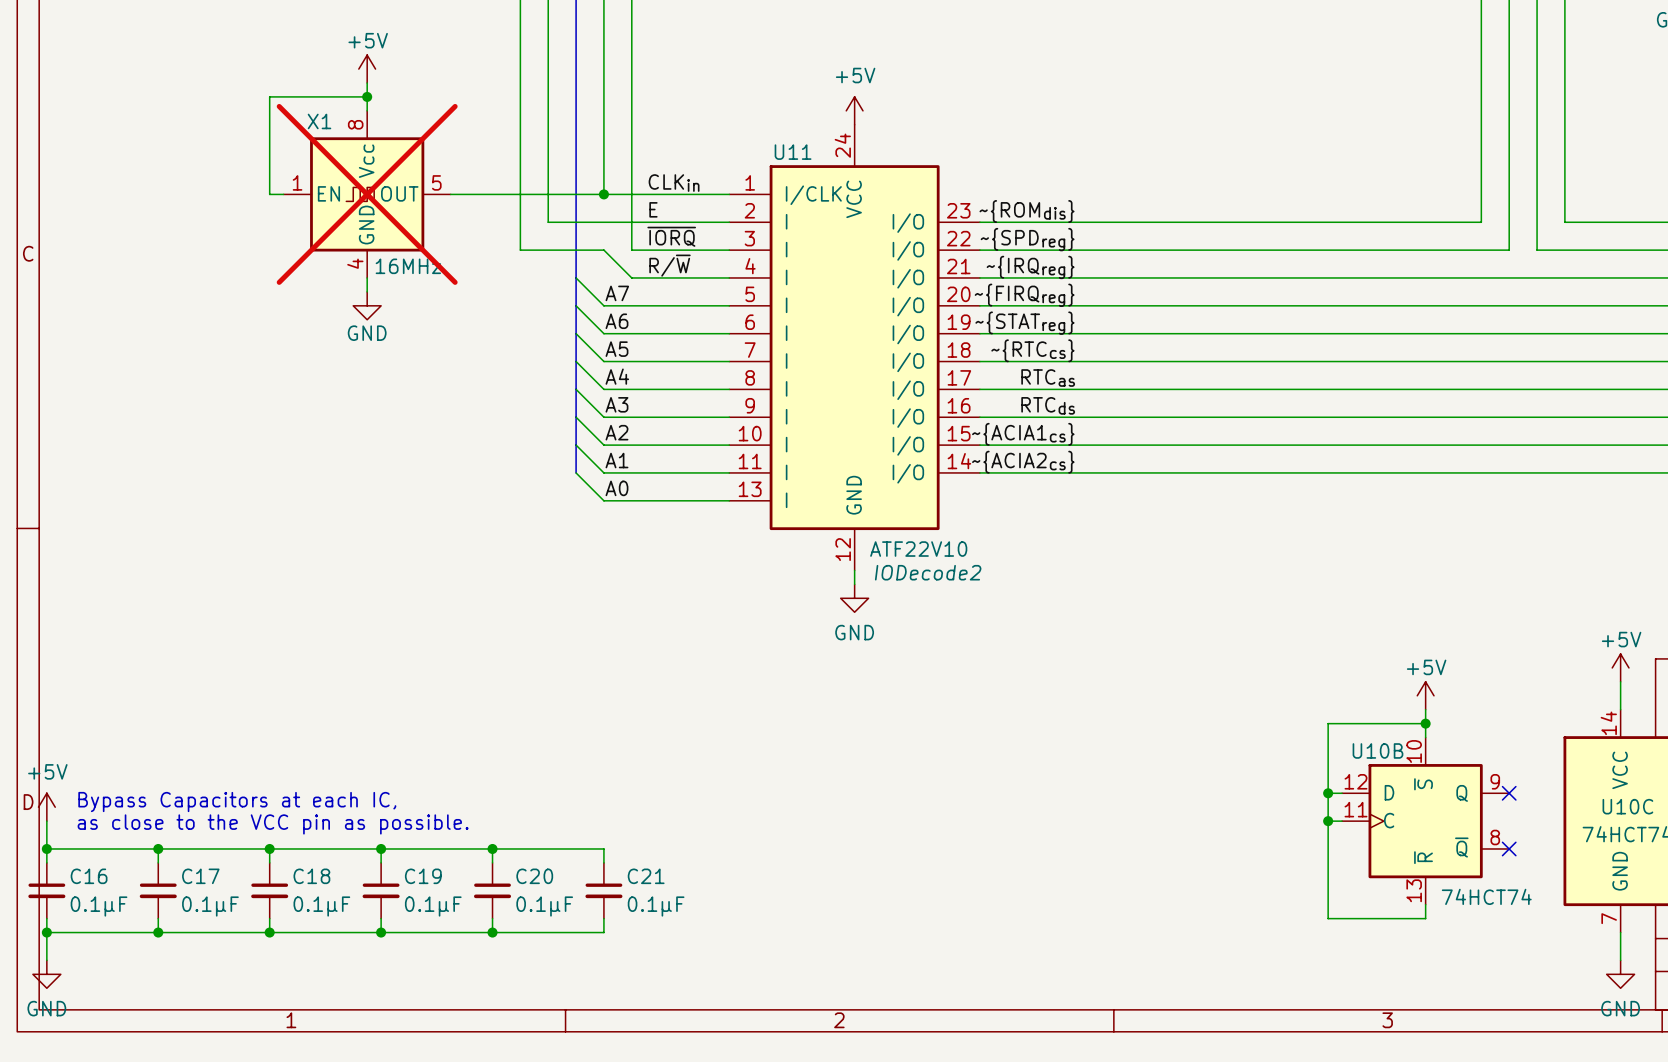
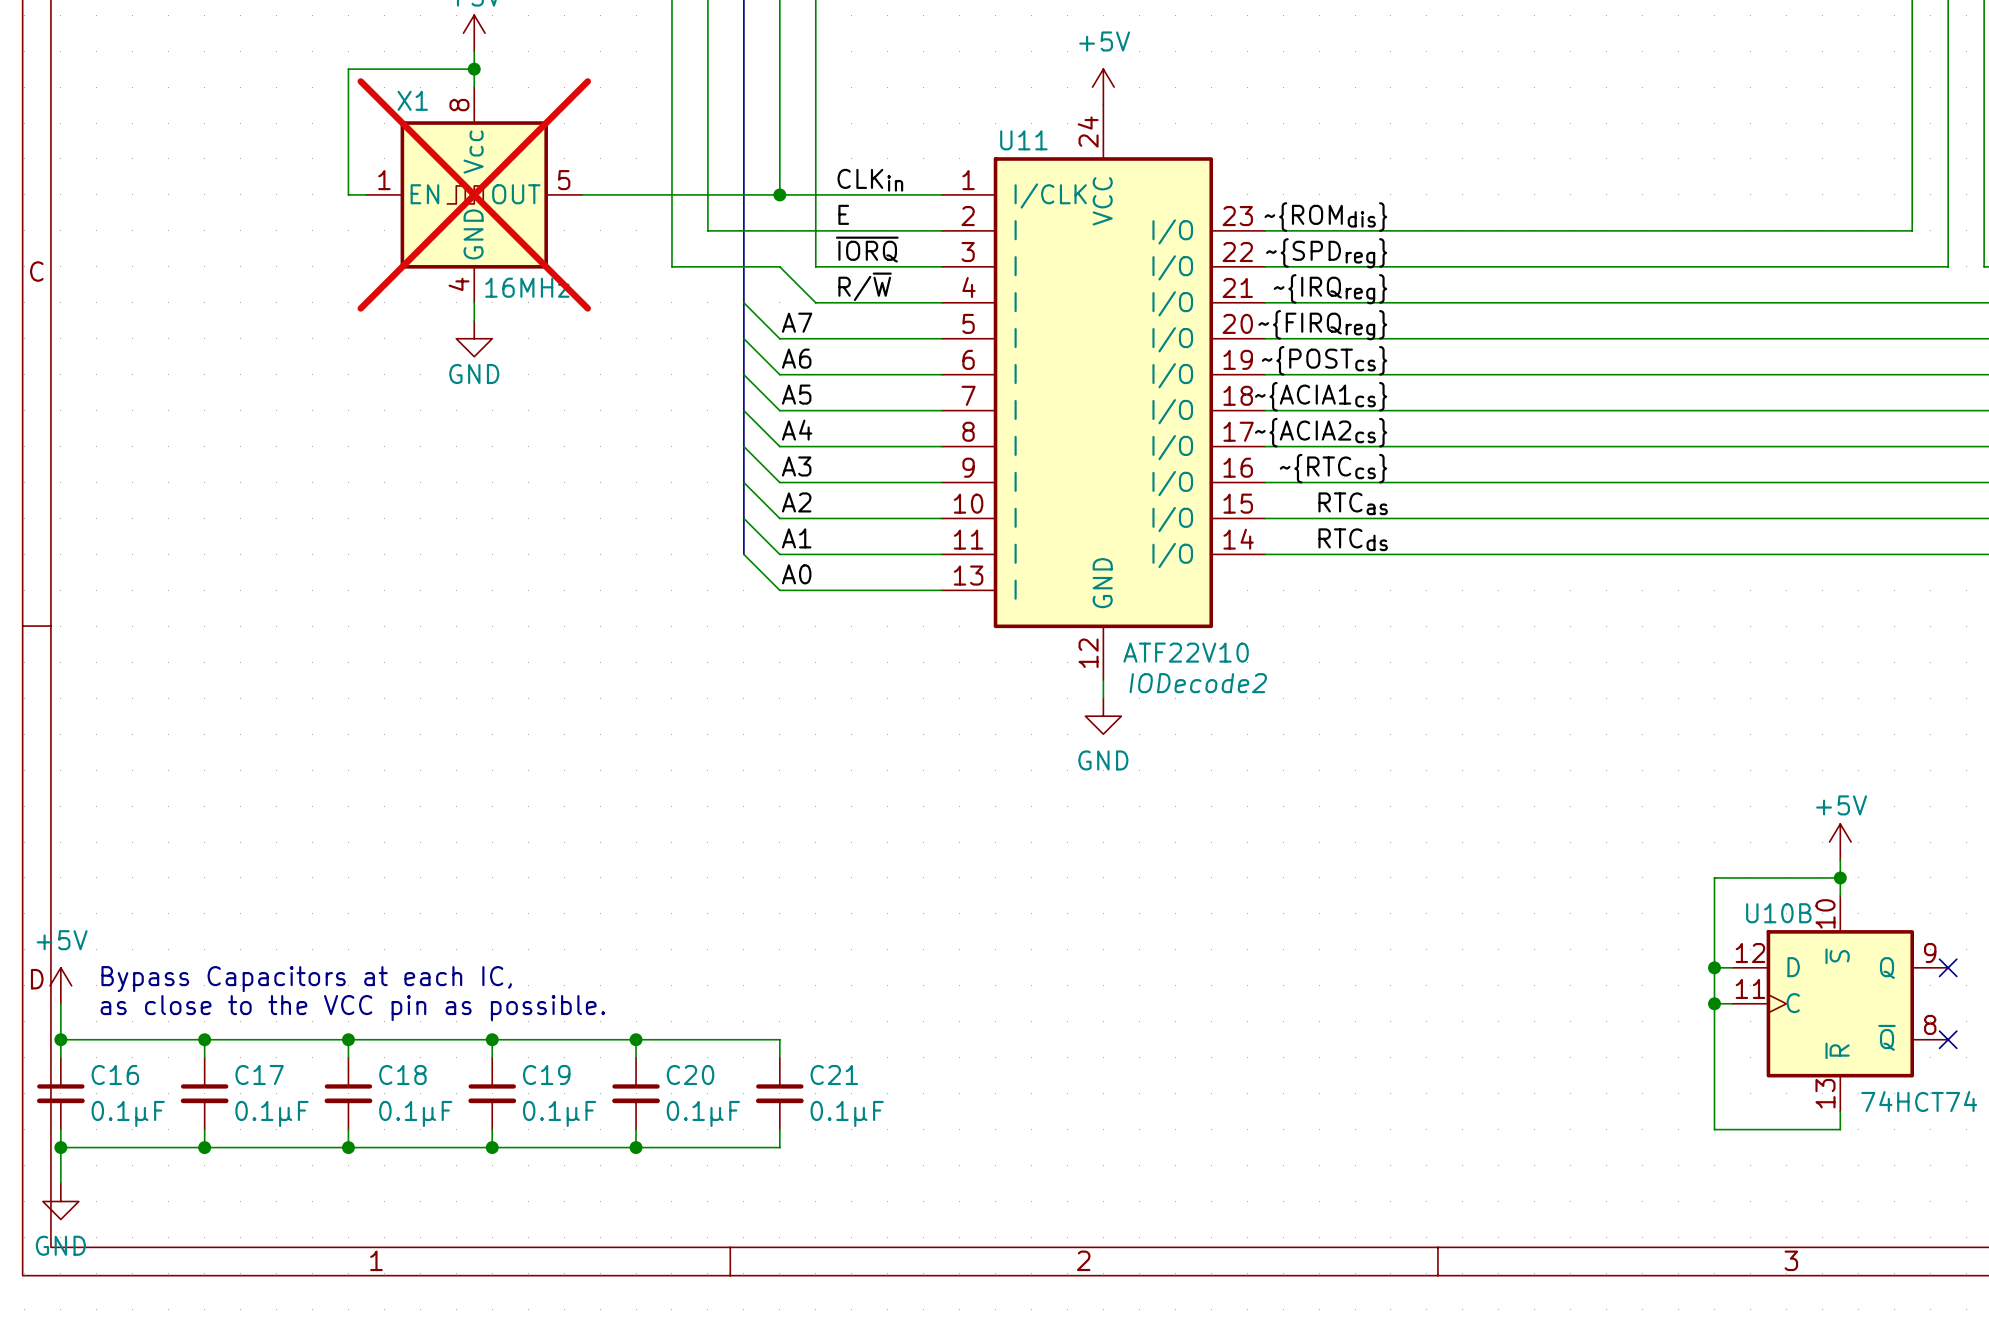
label: ~{STATreg} (1024, 323) -> ~{POSTcs} (1324, 360)
label: ~{RTCcs} (1032, 350) -> ~{ACIA1cs} (1321, 396)
label: RTCas (1048, 378) -> ~{ACIA2cs} (1321, 432)
label: RTCds (1048, 405) -> ~{RTCcs} (1333, 468)
label: ~{ACIA1cs} (1023, 434) -> RTCas (1353, 503)
label: ~{ACIA2cs} (1023, 462) -> RTCds (1353, 539)

